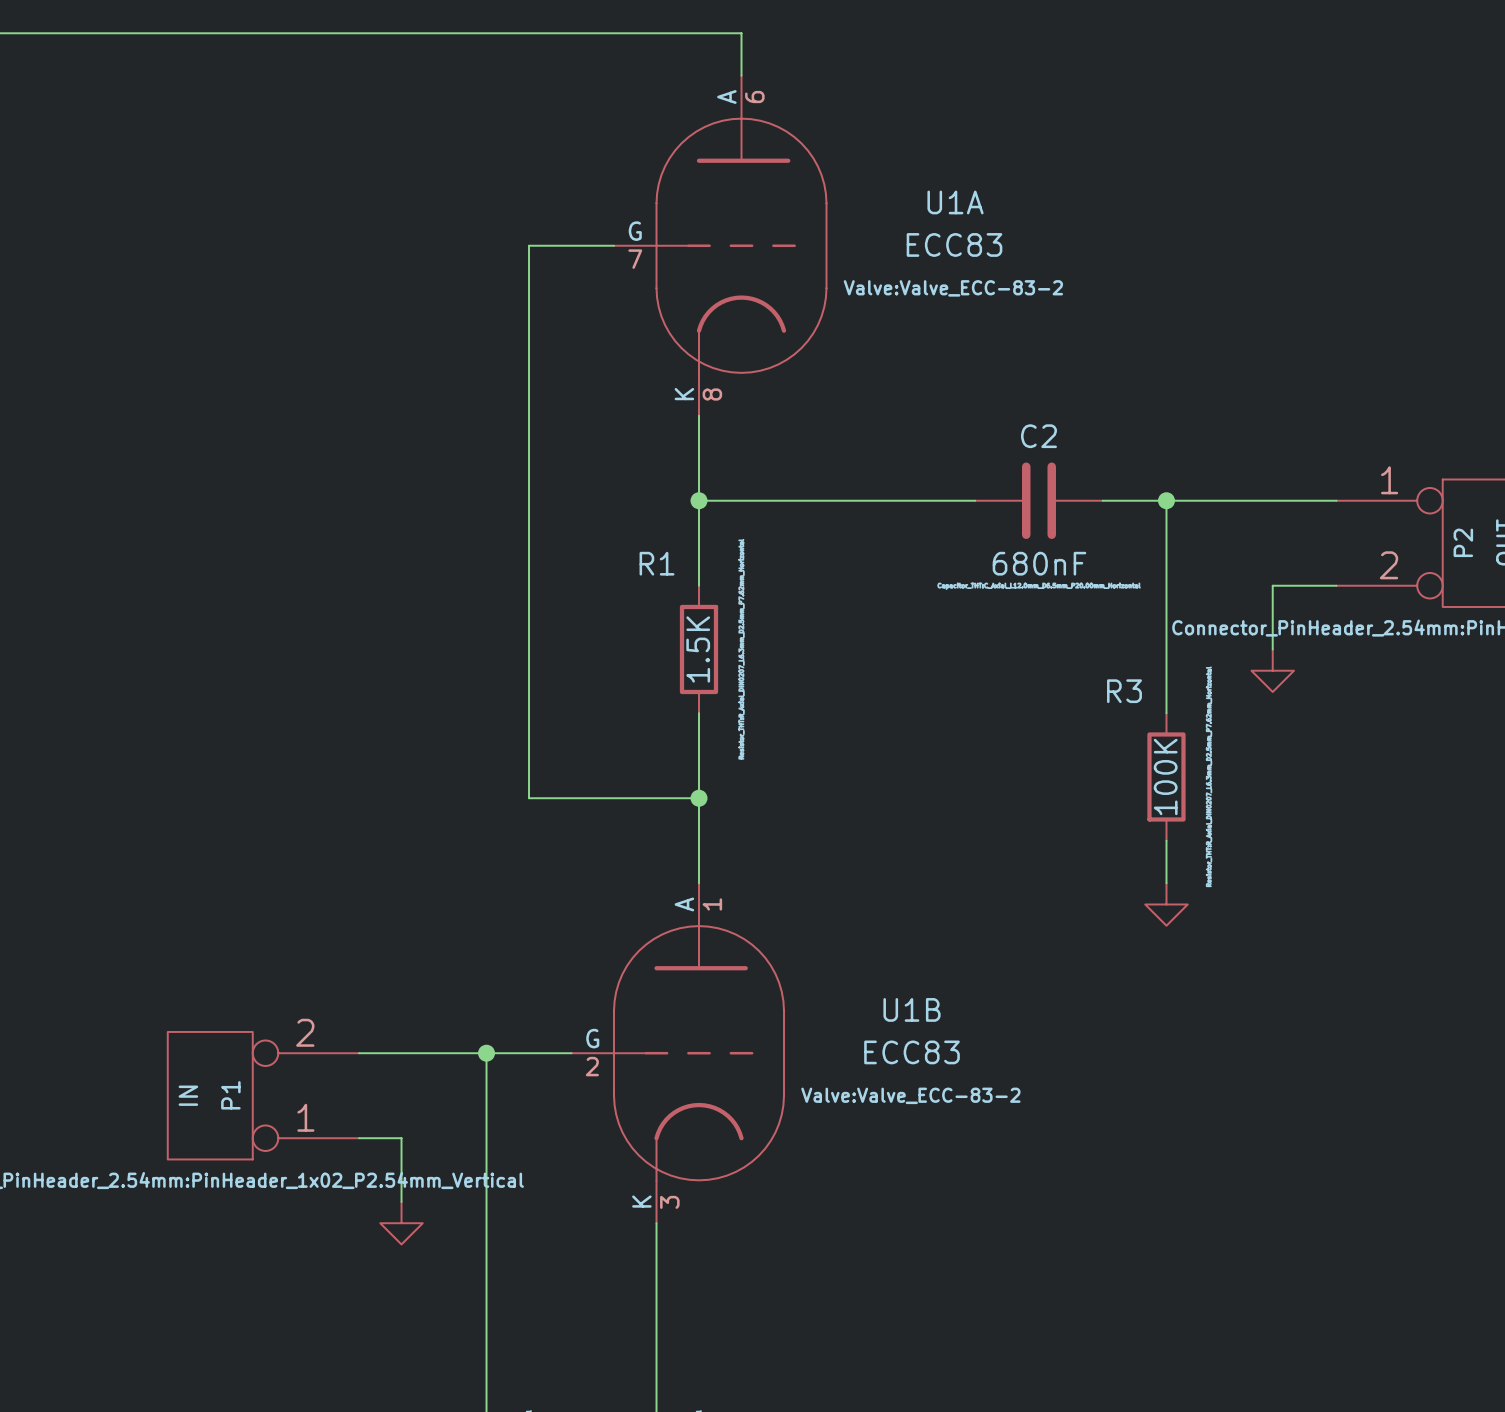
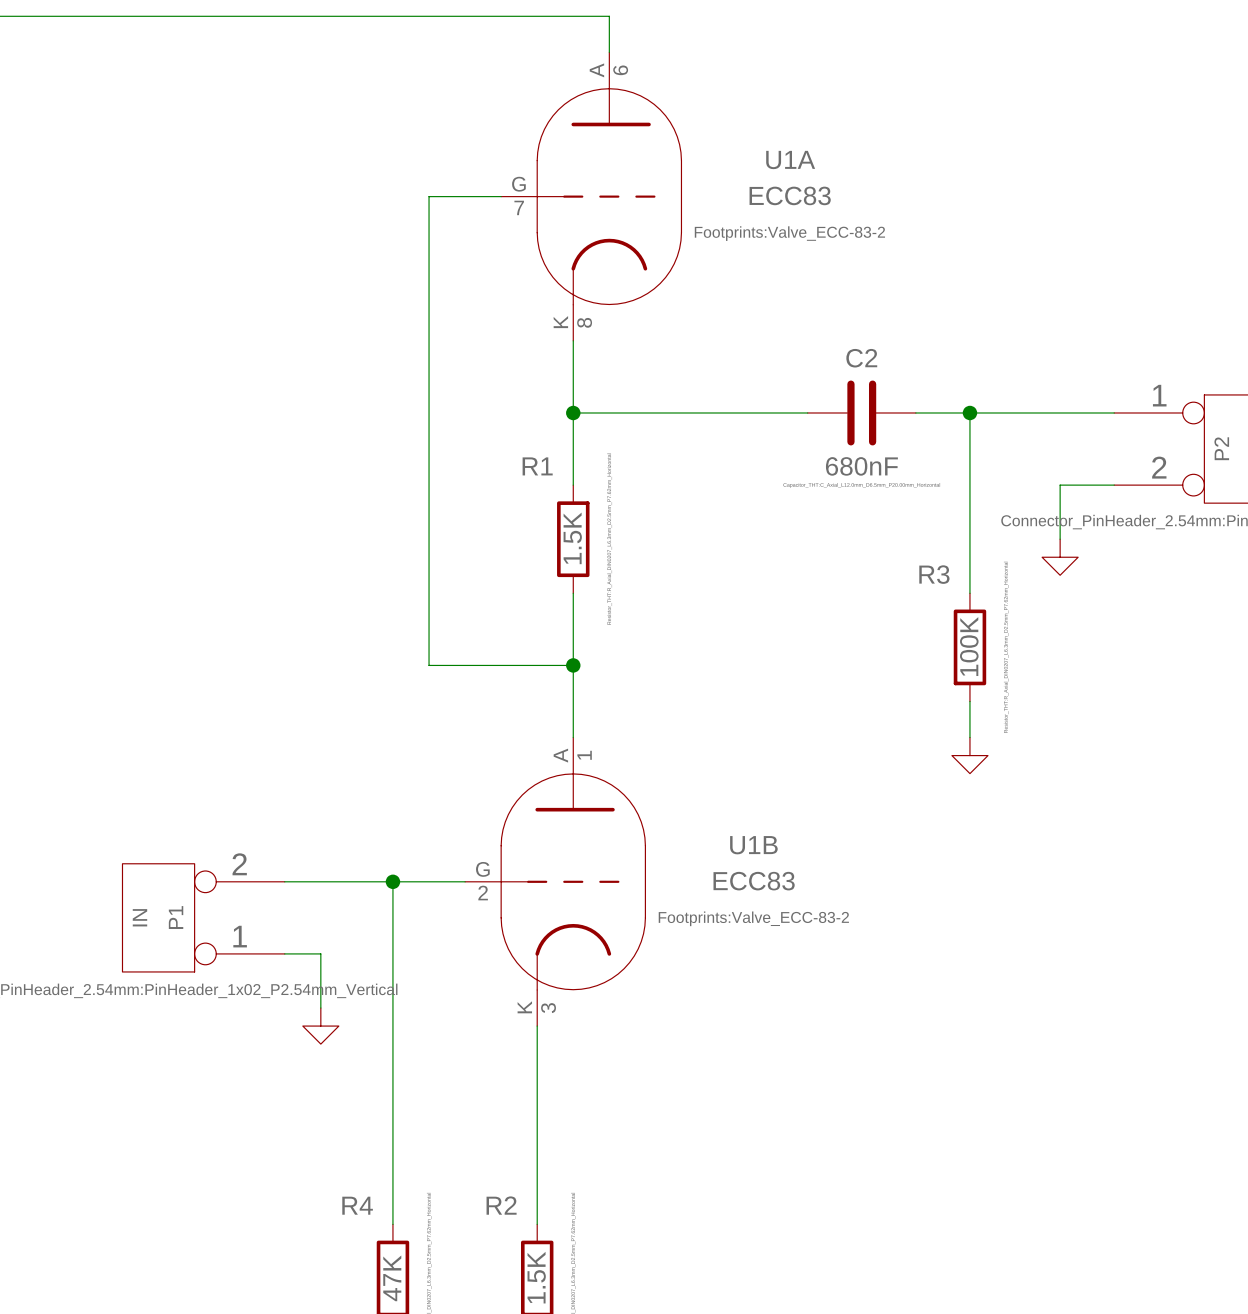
U1A text: Valve:Valve_ECC-83-2 (953, 288) -> Footprints:Valve_ECC-83-2 (789, 233)
U1B text: Valve:Valve_ECC-83-2 (910, 1095) -> Footprints:Valve_ECC-83-2 (753, 918)

